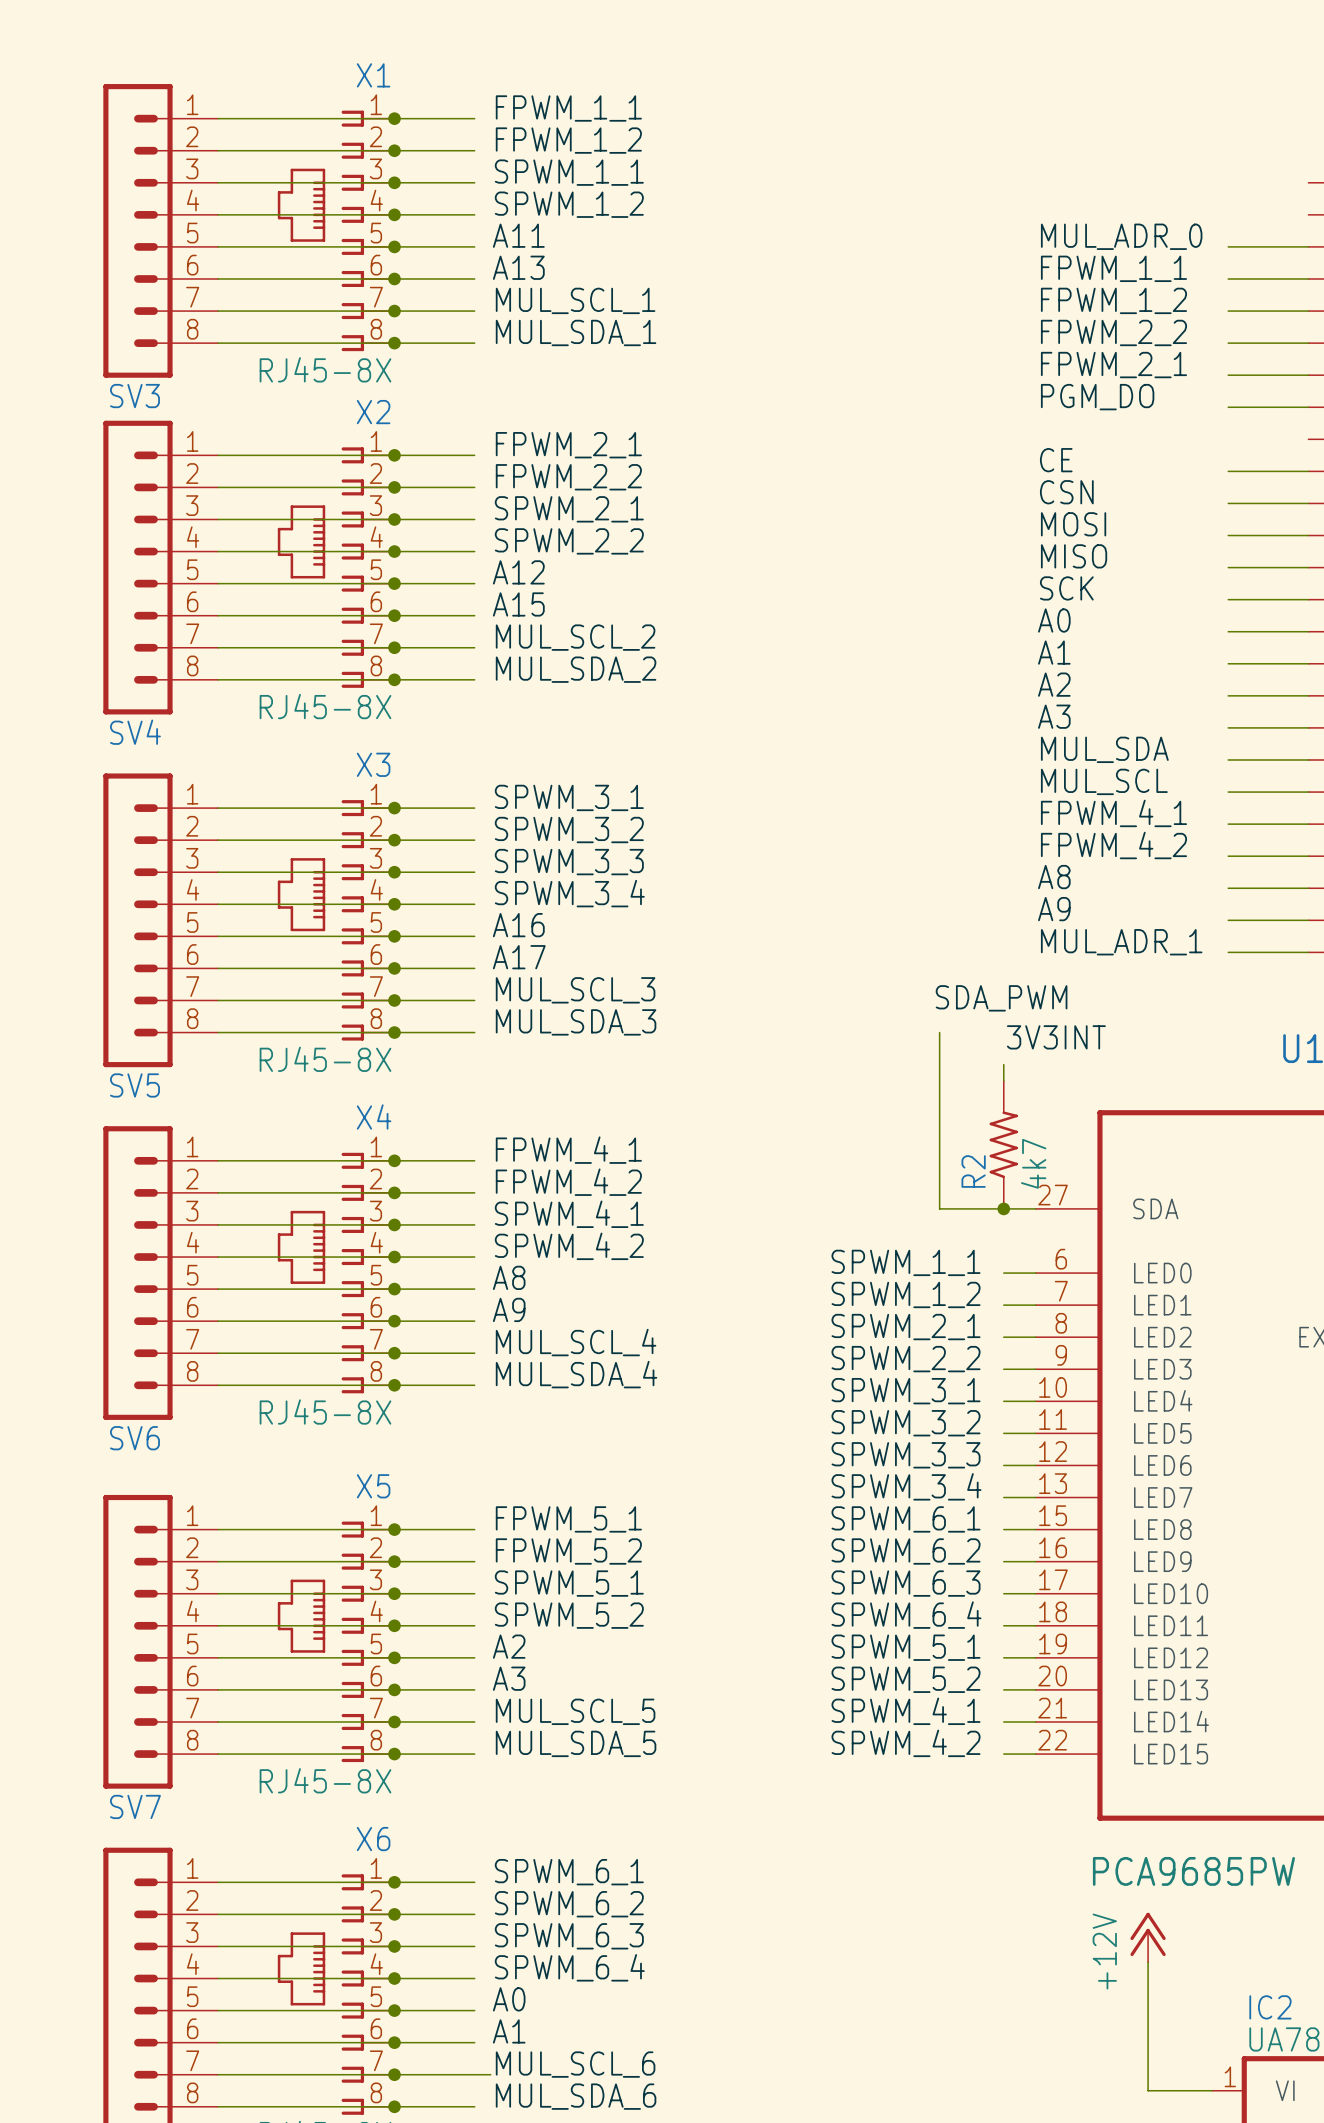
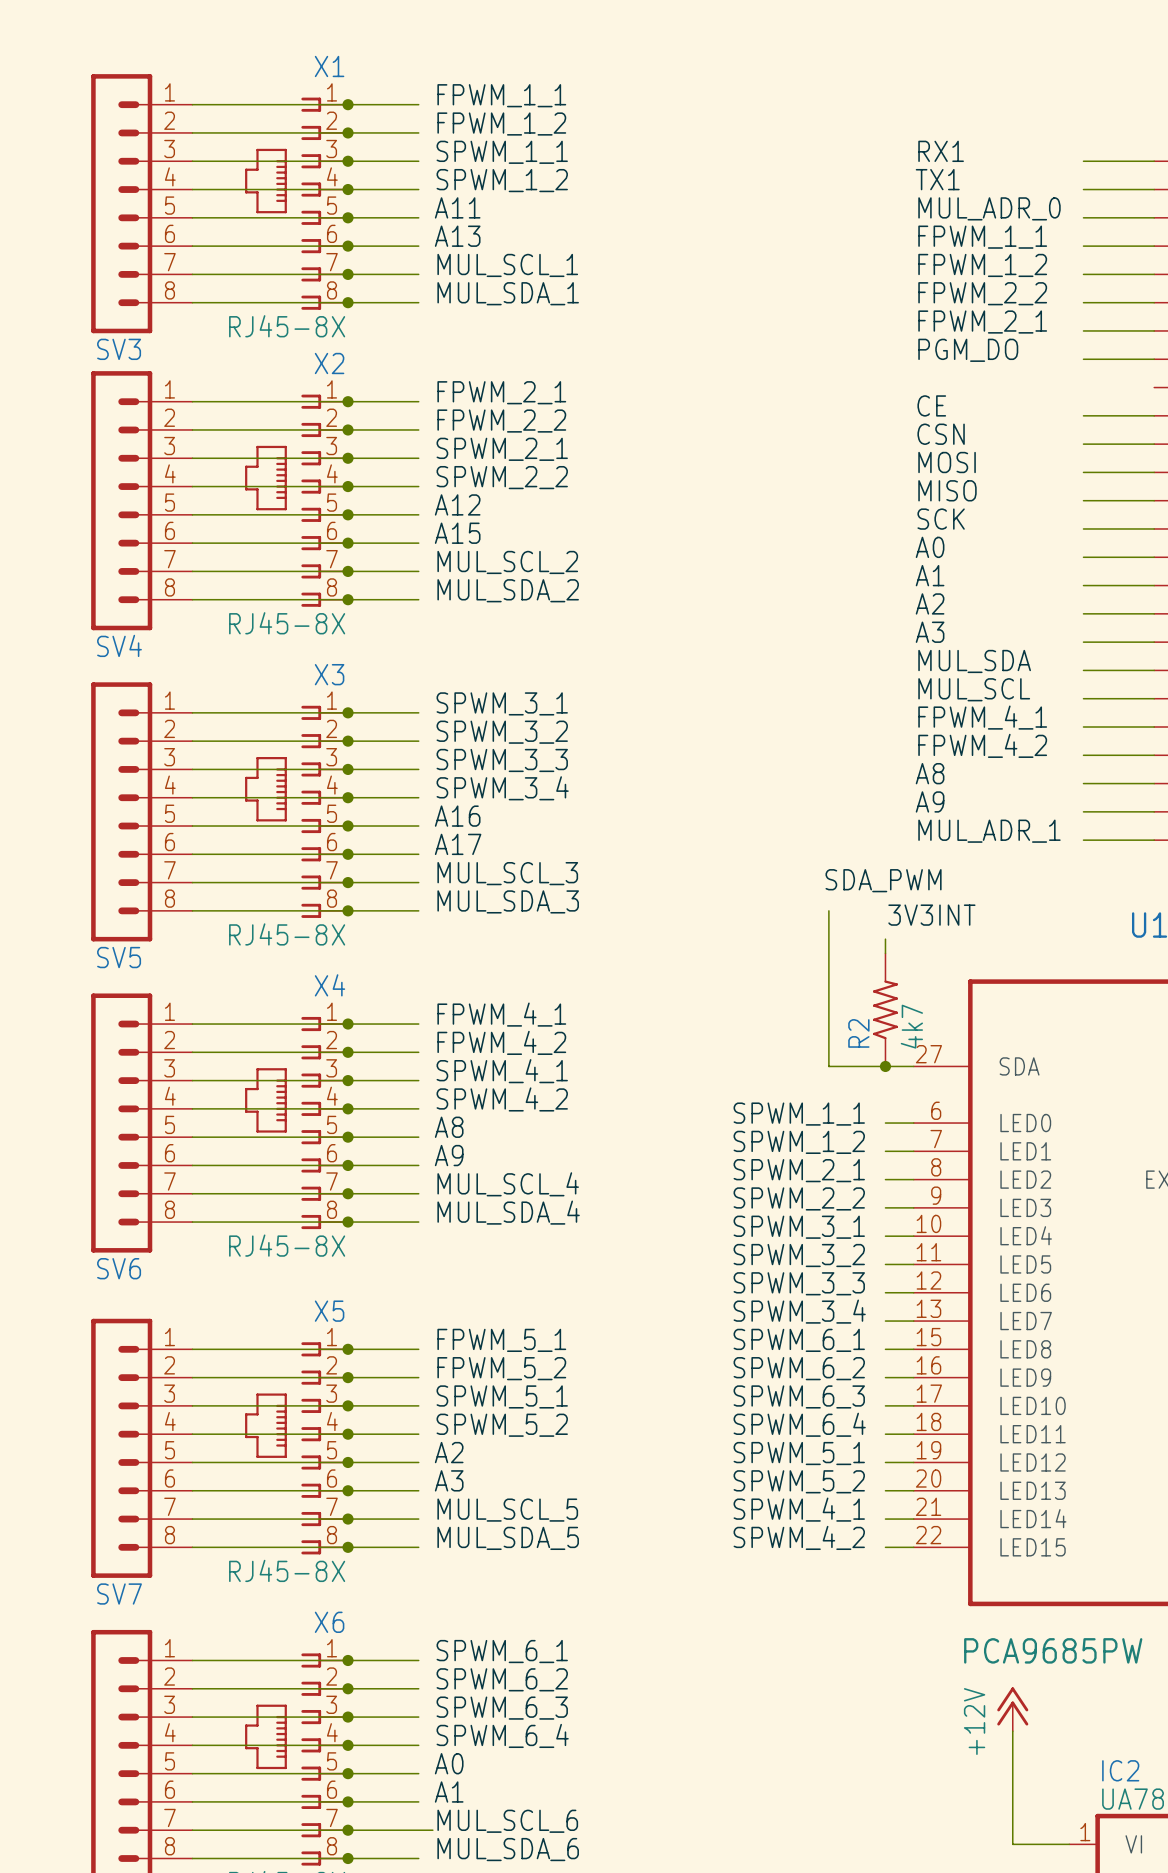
label: none -> RX1 (941, 151)
wire: none -> (1083, 161) (1154, 161)
label: none -> TX1 (937, 179)
wire: none -> (1083, 189) (1154, 189)

